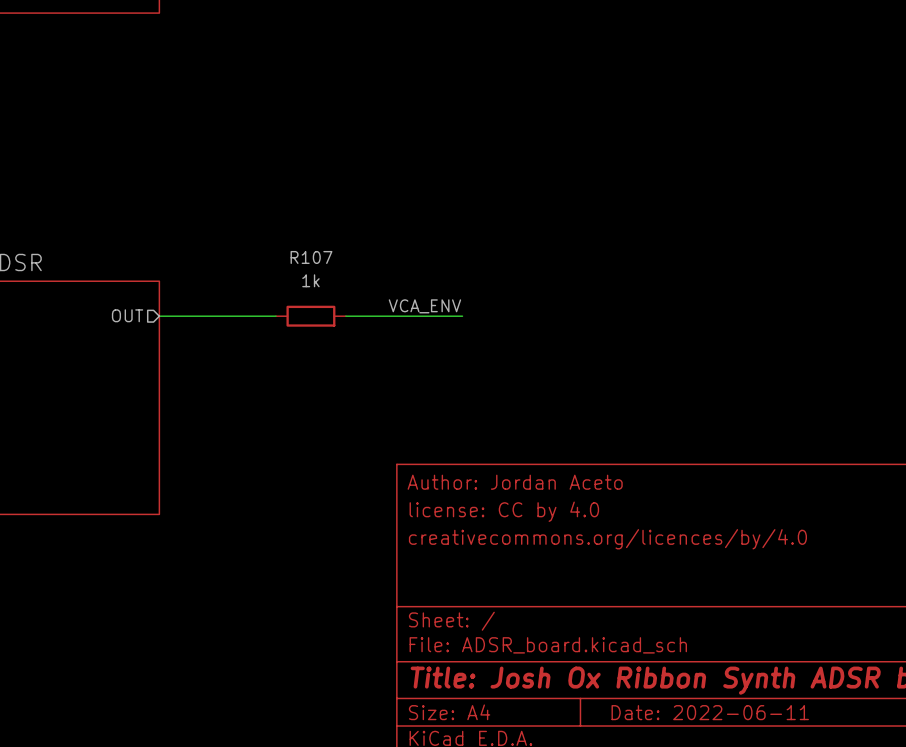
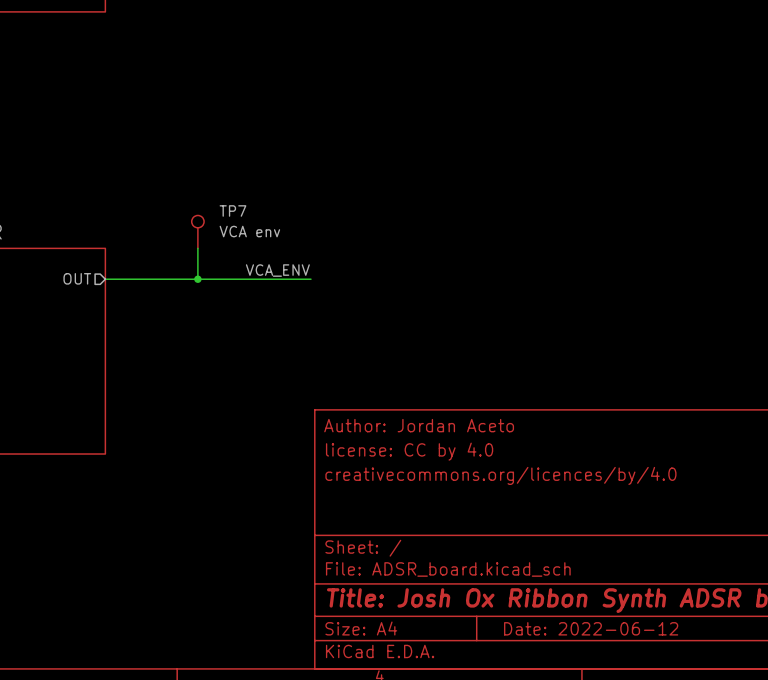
TP7: none -> VCA env (197, 231)
wire: none -> (197, 248) (197, 279)
label position: VCA_ENV (424, 306) -> VCA_ENV (277, 270)
junction: none -> (197, 279)
R107: 1k (310, 316) -> none
wire: (392, 316) (462, 316) -> (208, 279) (269, 279)
title block: Date: 2022-06-11 (710, 712) -> Date: 2022-06-12 (591, 628)

